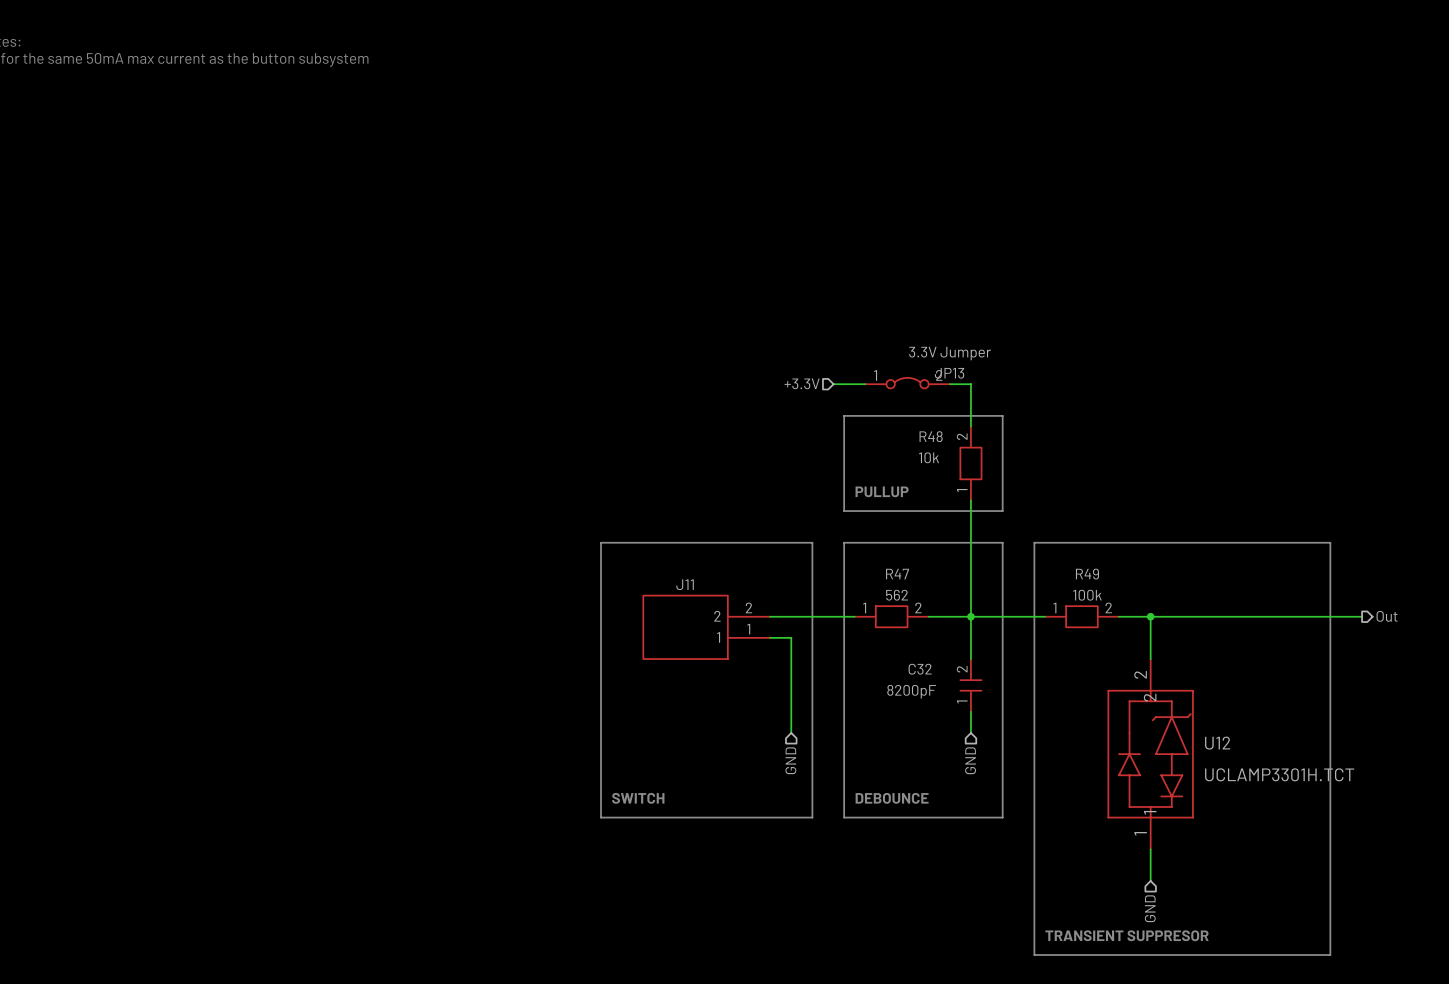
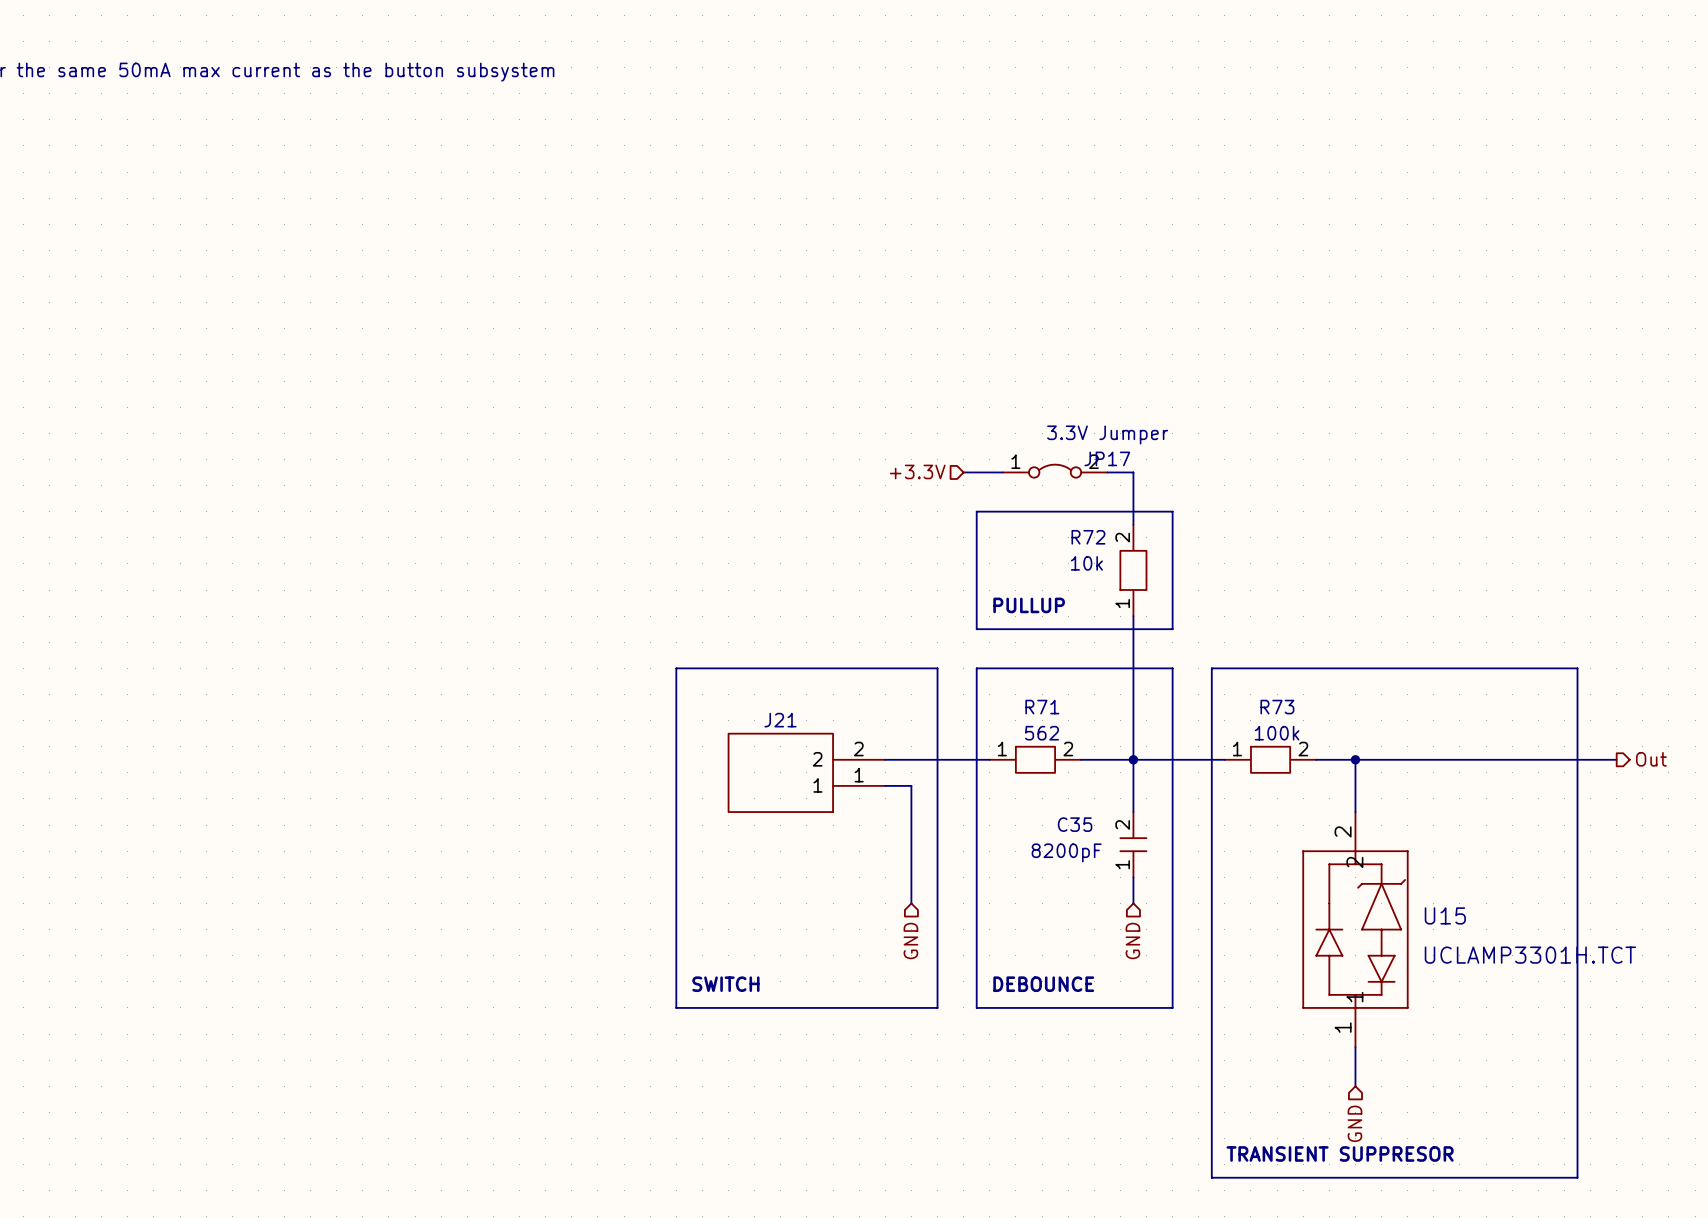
JP13 name: JP13 (949, 373) -> JP17 (1107, 458)
R48 name: R48 (931, 436) -> R72 (1088, 537)
R47 name: R47 (897, 574) -> R71 (1042, 707)
R49 name: R49 (1087, 574) -> R73 (1277, 707)
J11 name: J11 (685, 584) -> J21 (780, 720)
C32 name: C32 (920, 669) -> C35 (1075, 824)
U12 name: U12 (1217, 743) -> U15 (1445, 915)

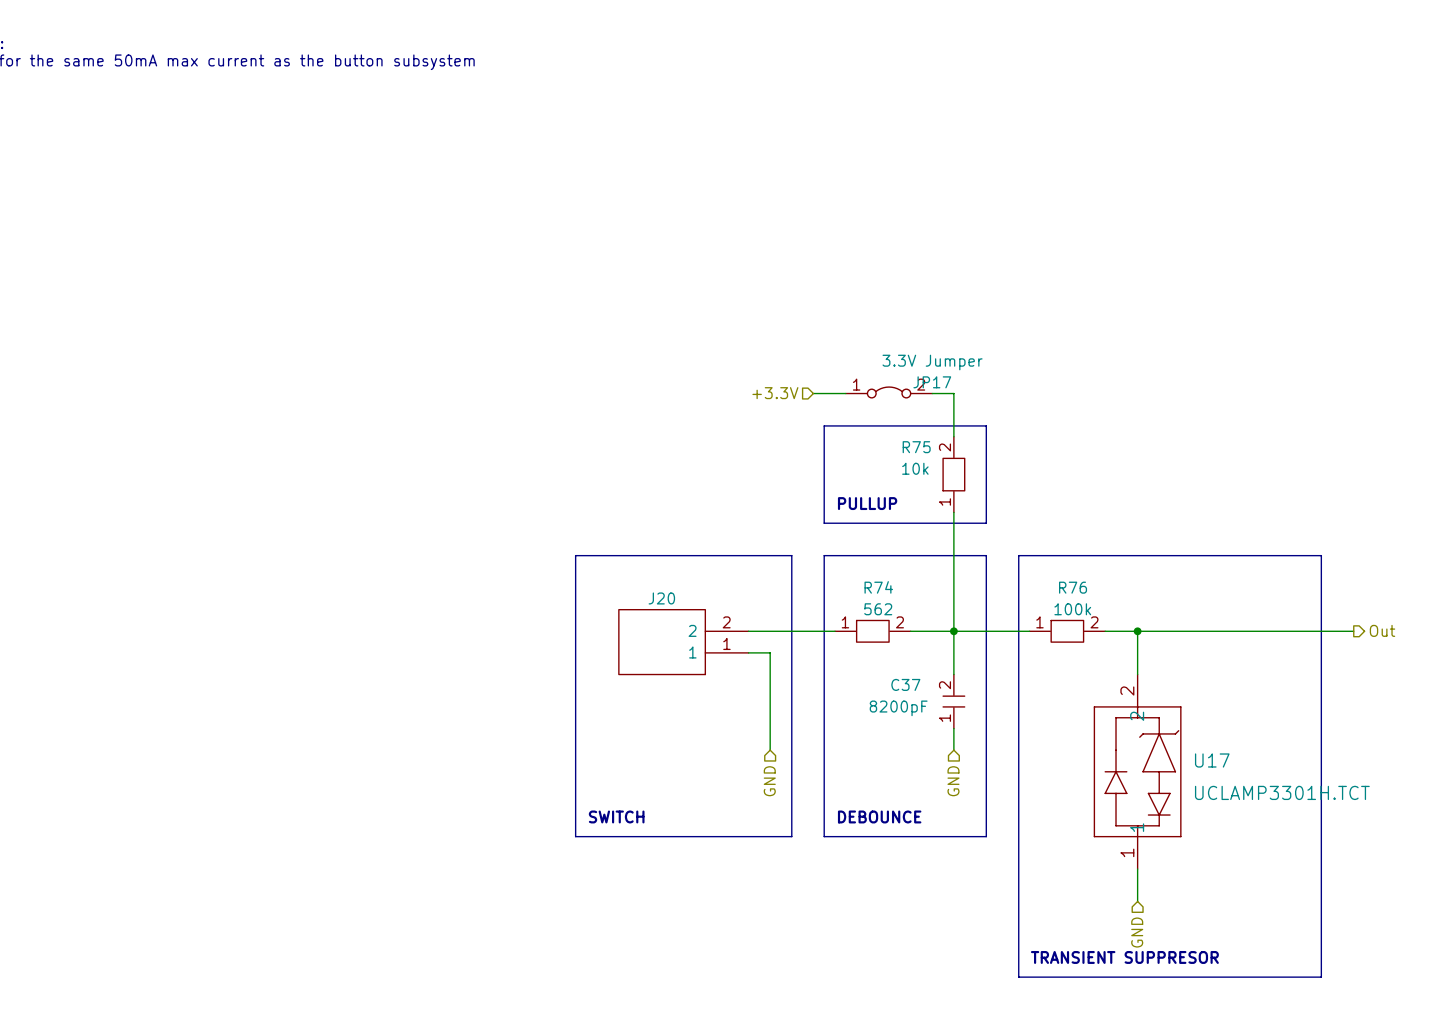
R72 name: R72 (1088, 537) -> R75 (916, 447)
R71 name: R71 (1042, 707) -> R74 (878, 587)
R73 name: R73 (1277, 707) -> R76 (1073, 587)
J21 name: J21 (780, 720) -> J20 (661, 598)
C35 name: C35 (1075, 824) -> C37 (905, 684)
U15 name: U15 (1445, 915) -> U17 (1212, 760)

